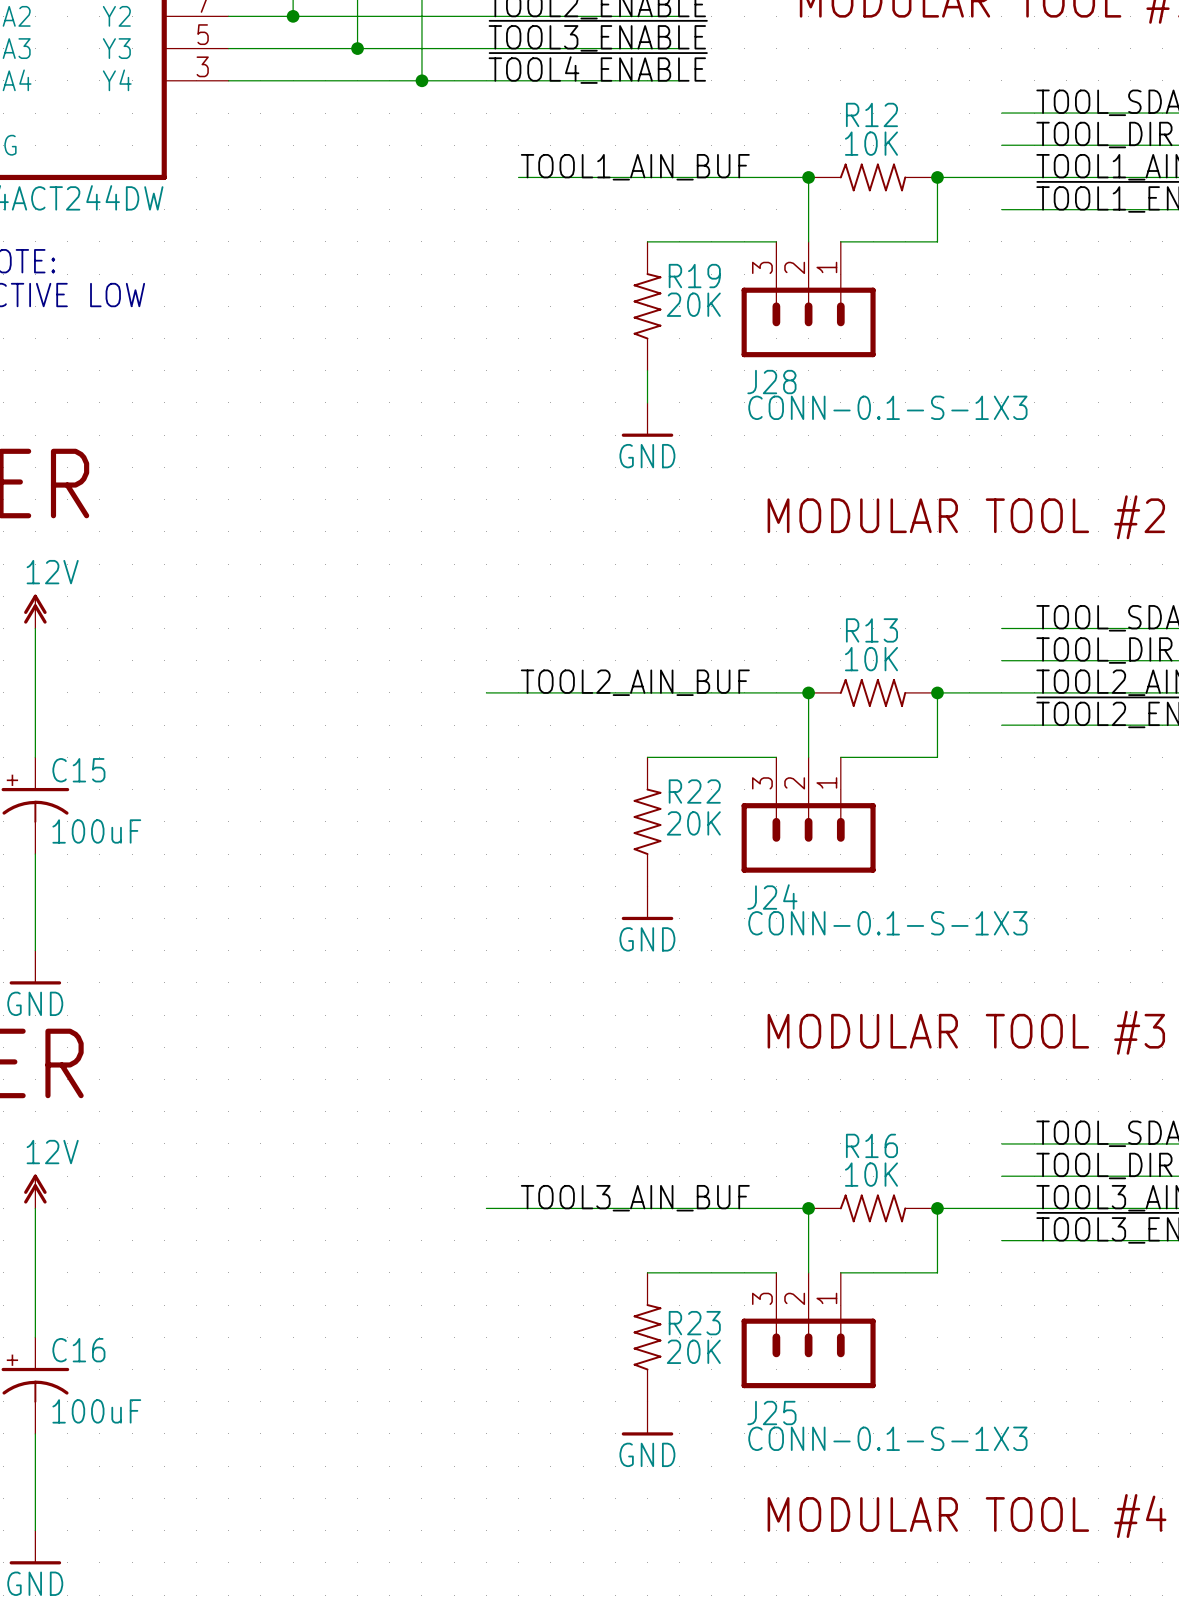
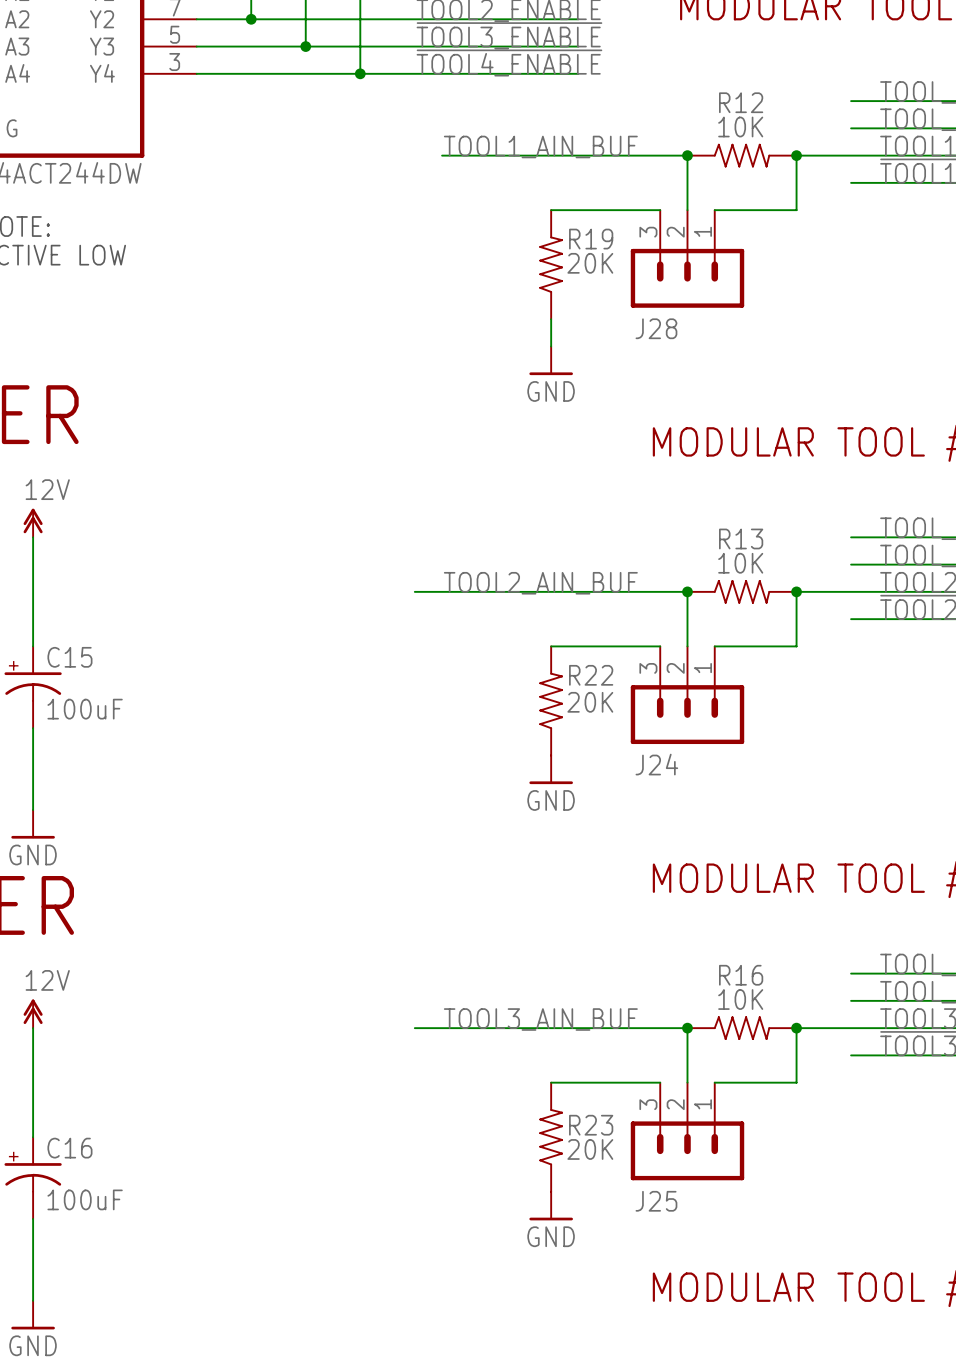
J28 value: CONN-0.1-S-1X3 (887, 407) -> none
J24 value: CONN-0.1-S-1X3 (887, 923) -> none
J25 value: CONN-0.1-S-1X3 (887, 1438) -> none

